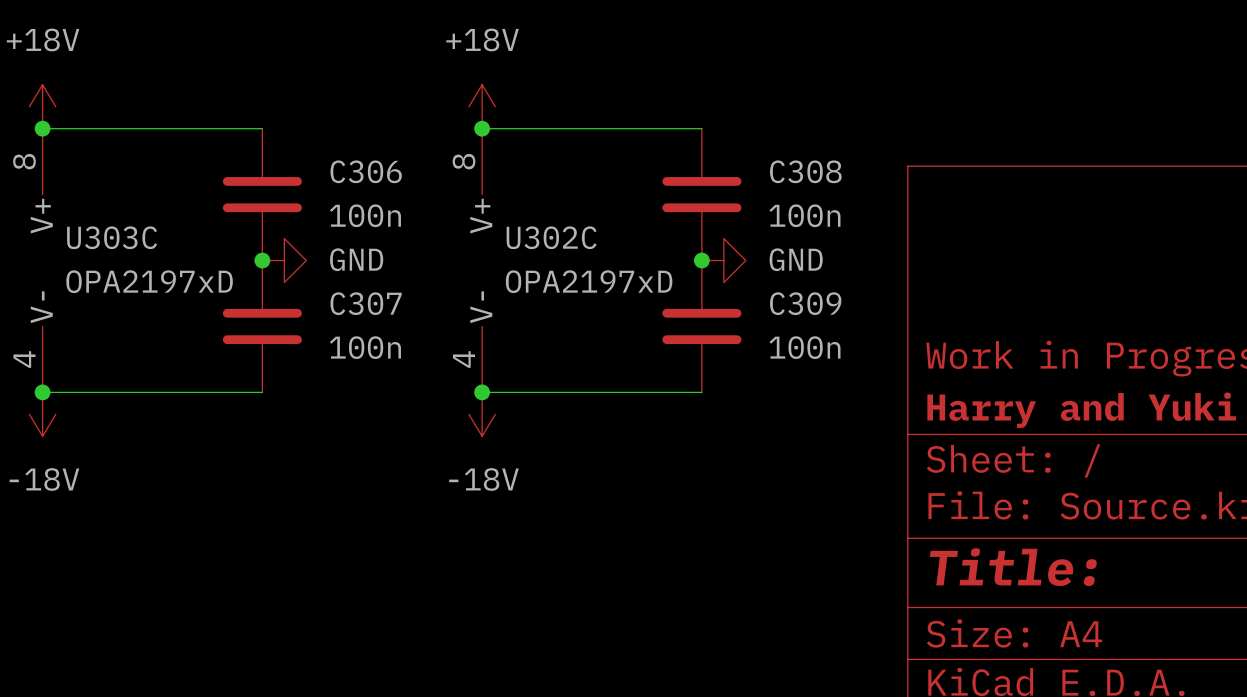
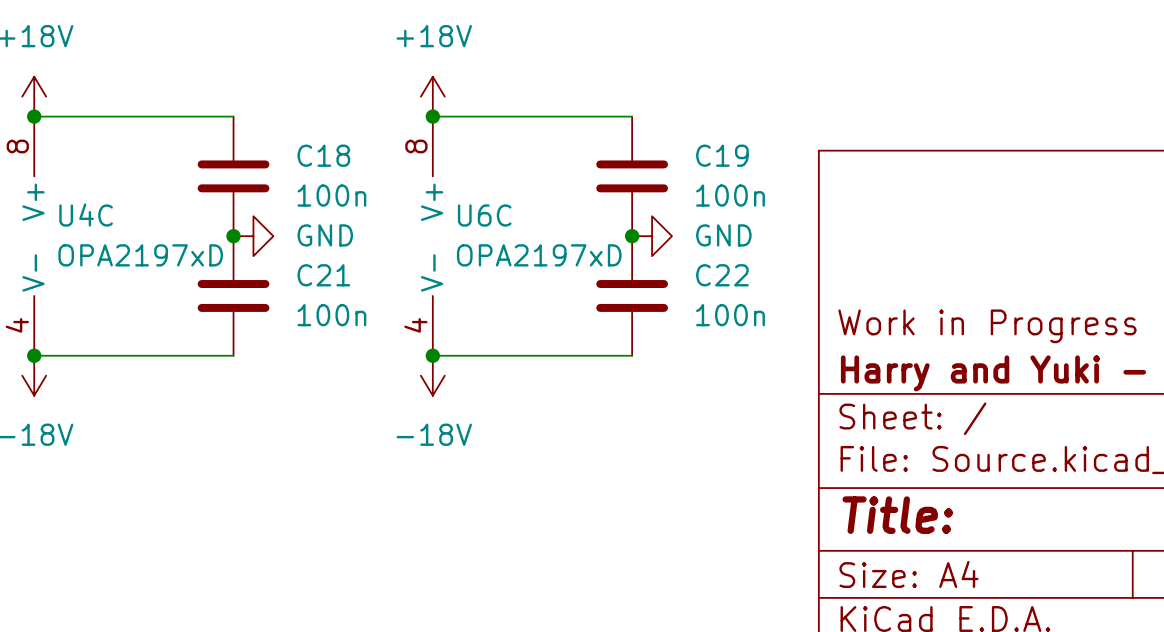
C306 name: C306 (366, 171) -> C18 (323, 155)
C308 name: C308 (805, 171) -> C19 (722, 155)
U303C name: U303C (112, 237) -> U4C (86, 215)
U302C name: U302C (551, 237) -> U6C (484, 215)
C307 name: C307 (366, 303) -> C21 (323, 275)
C309 name: C309 (805, 303) -> C22 (722, 275)

